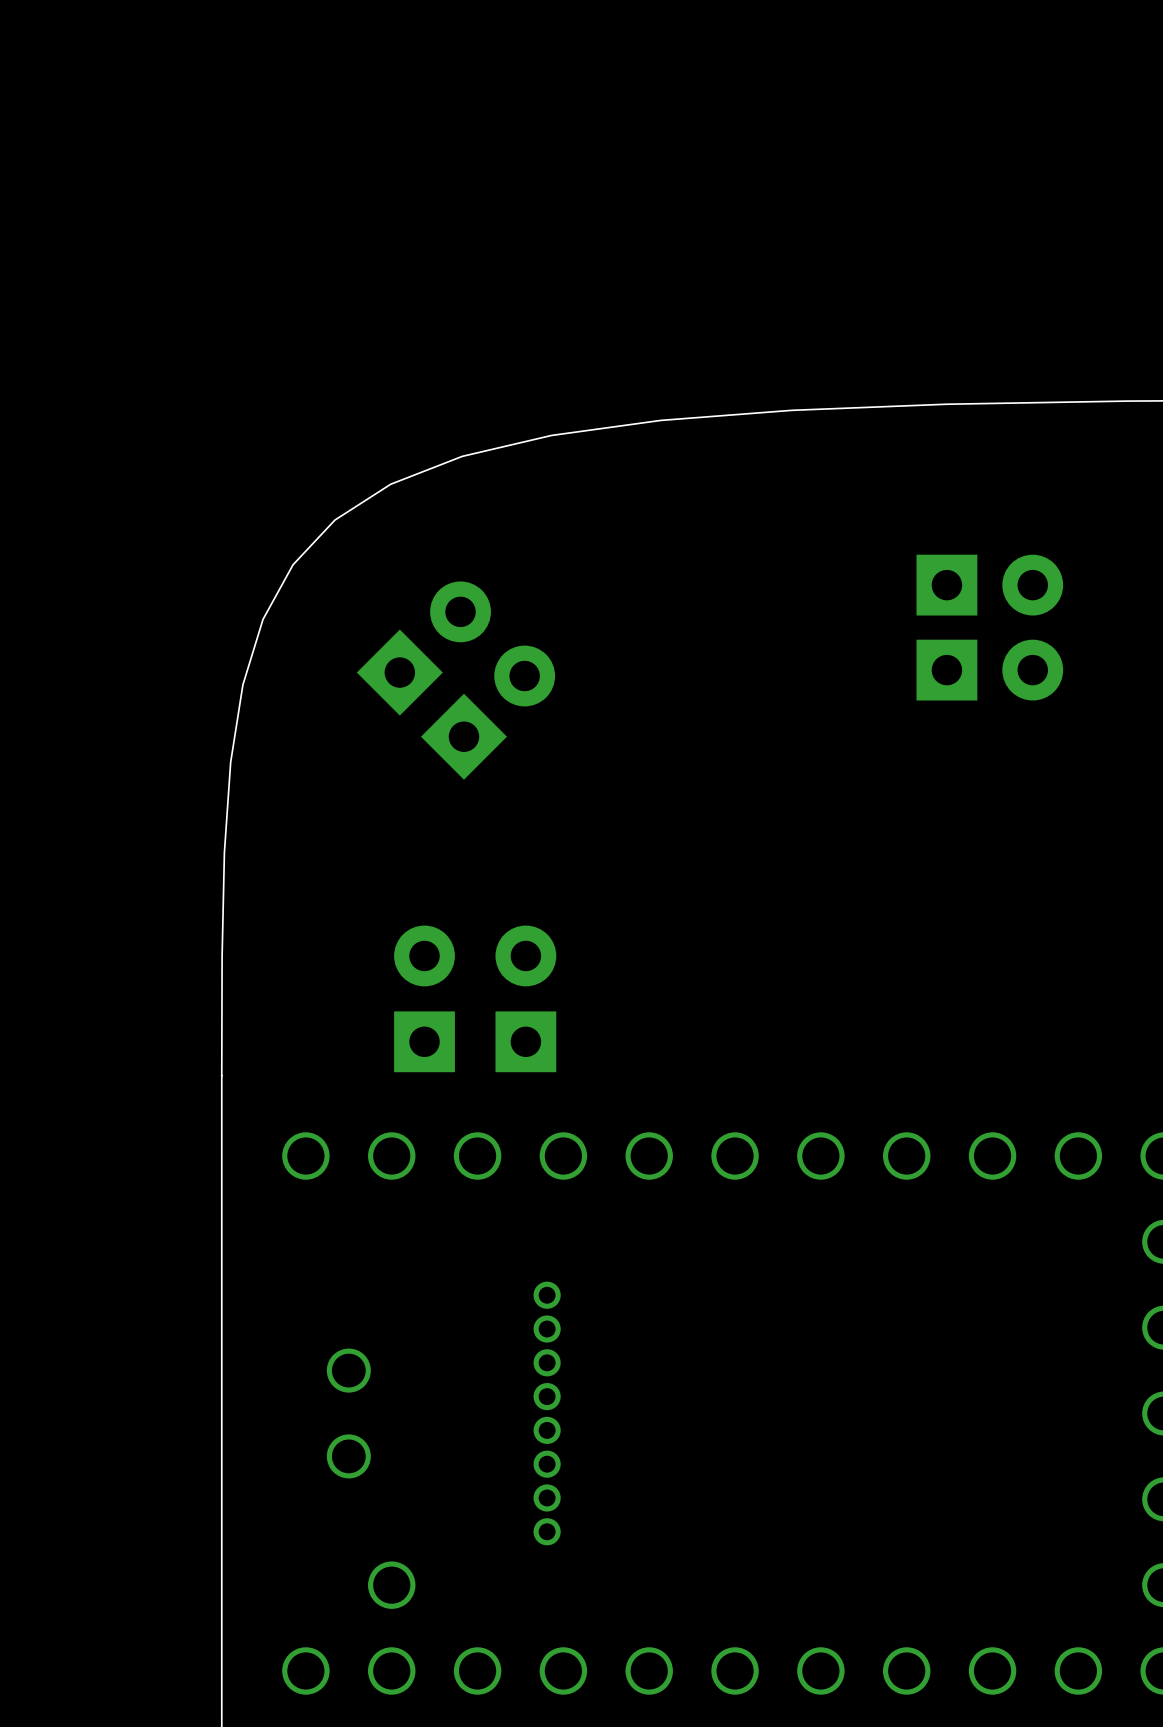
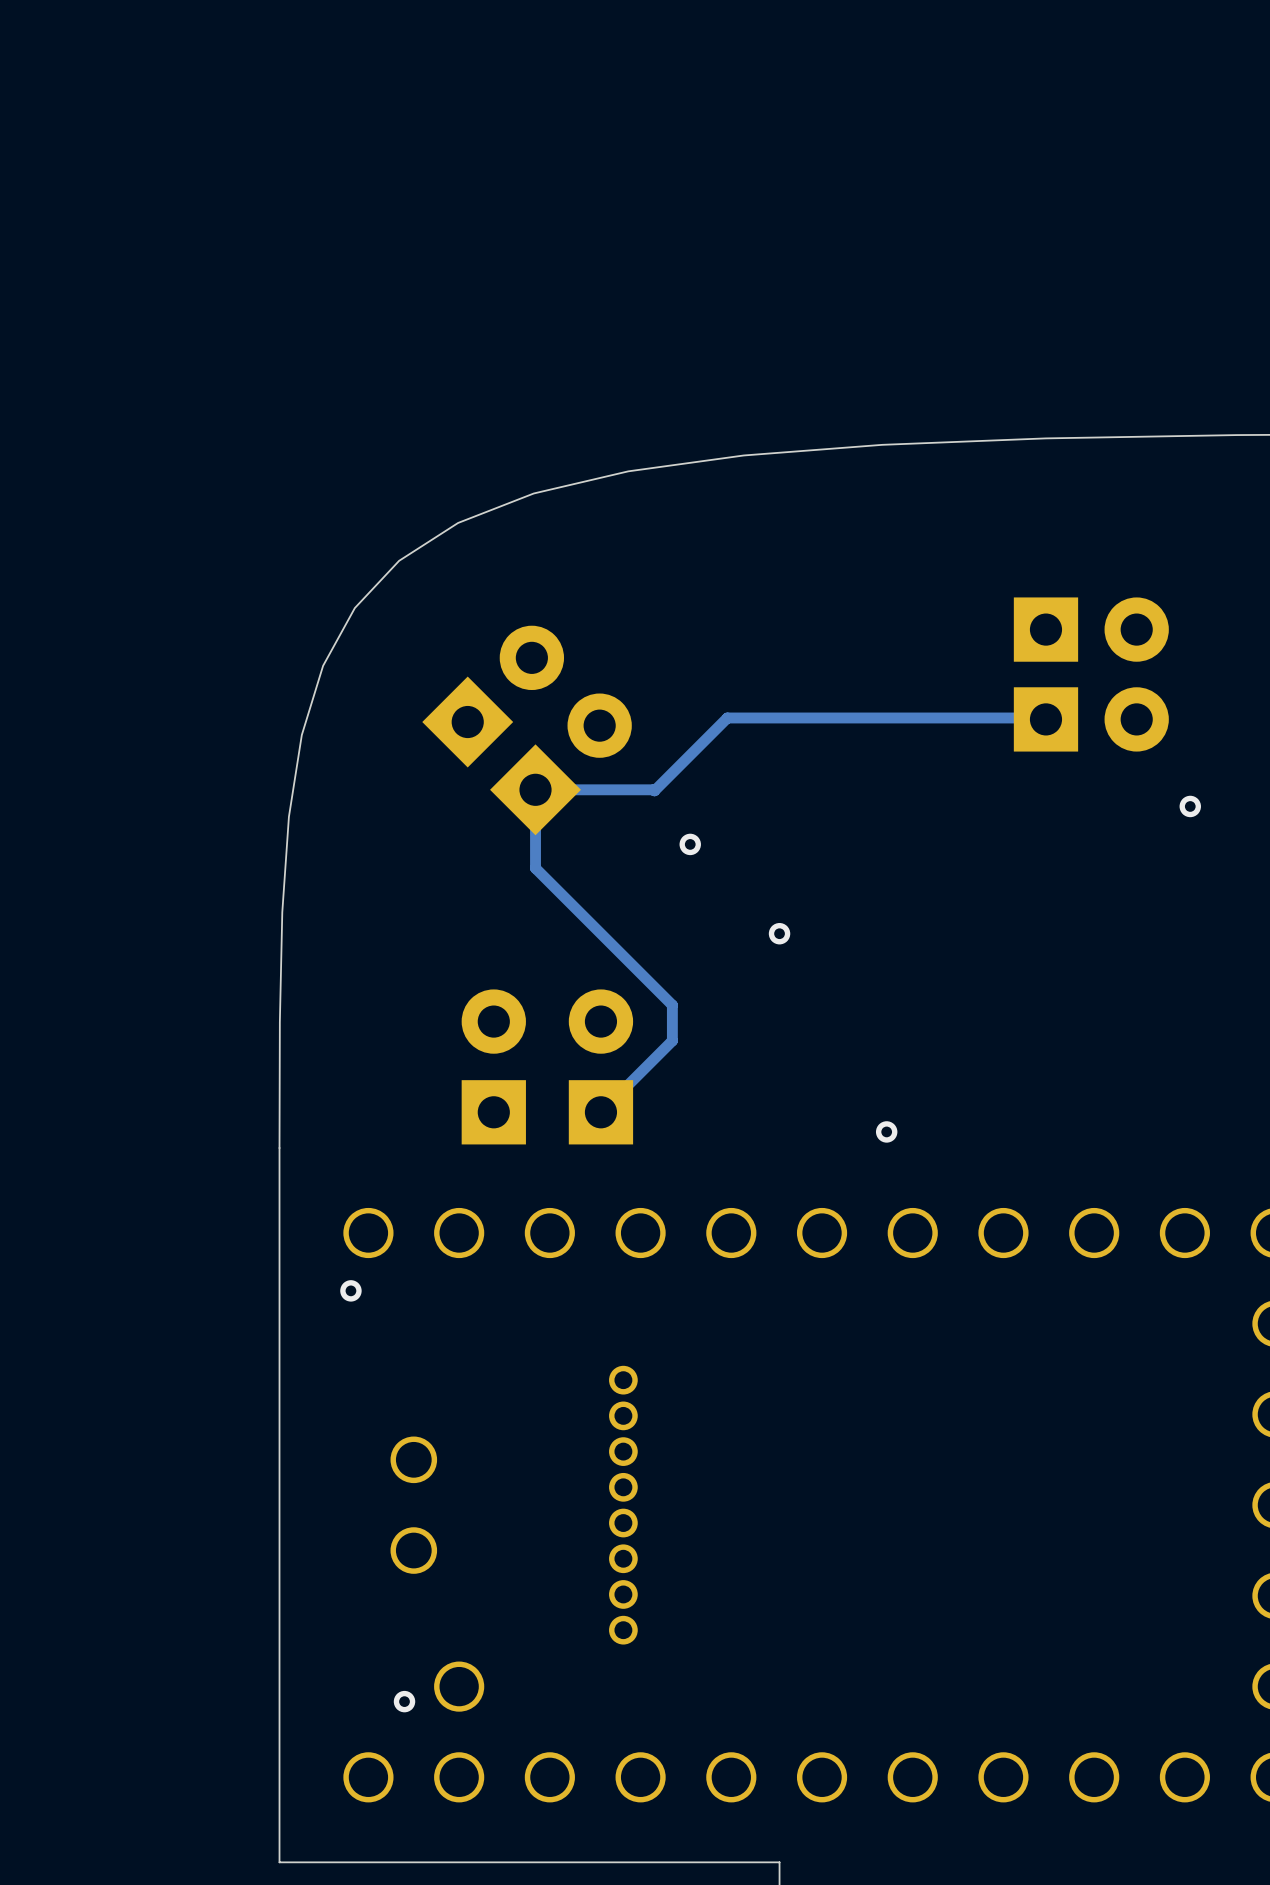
track: none -> (1045, 719) (727, 717) (654, 790) (535, 789) (535, 868) (672, 1005) (672, 1040) (600, 1112)
via: none -> (1190, 806)
via: none -> (690, 844)
via: none -> (779, 933)
via: none -> (886, 1131)
via: none -> (350, 1290)
via: none -> (404, 1701)

